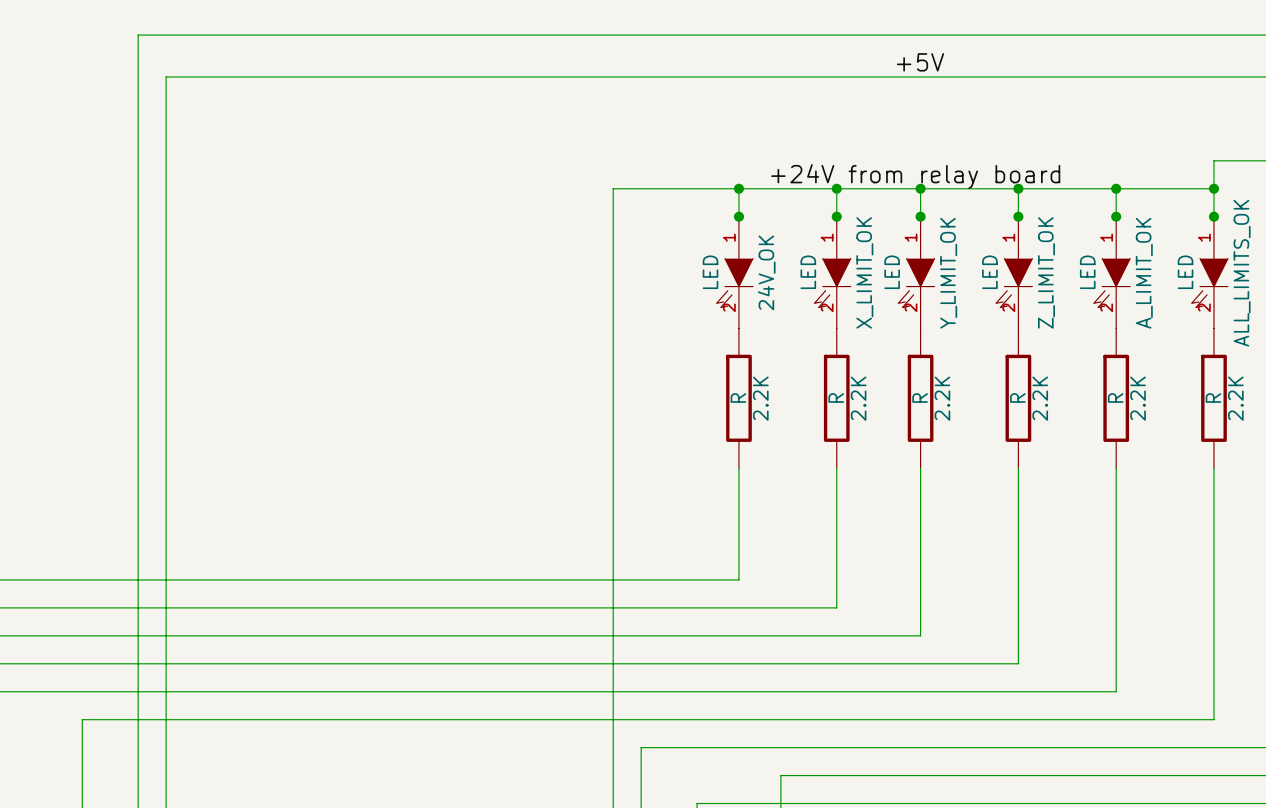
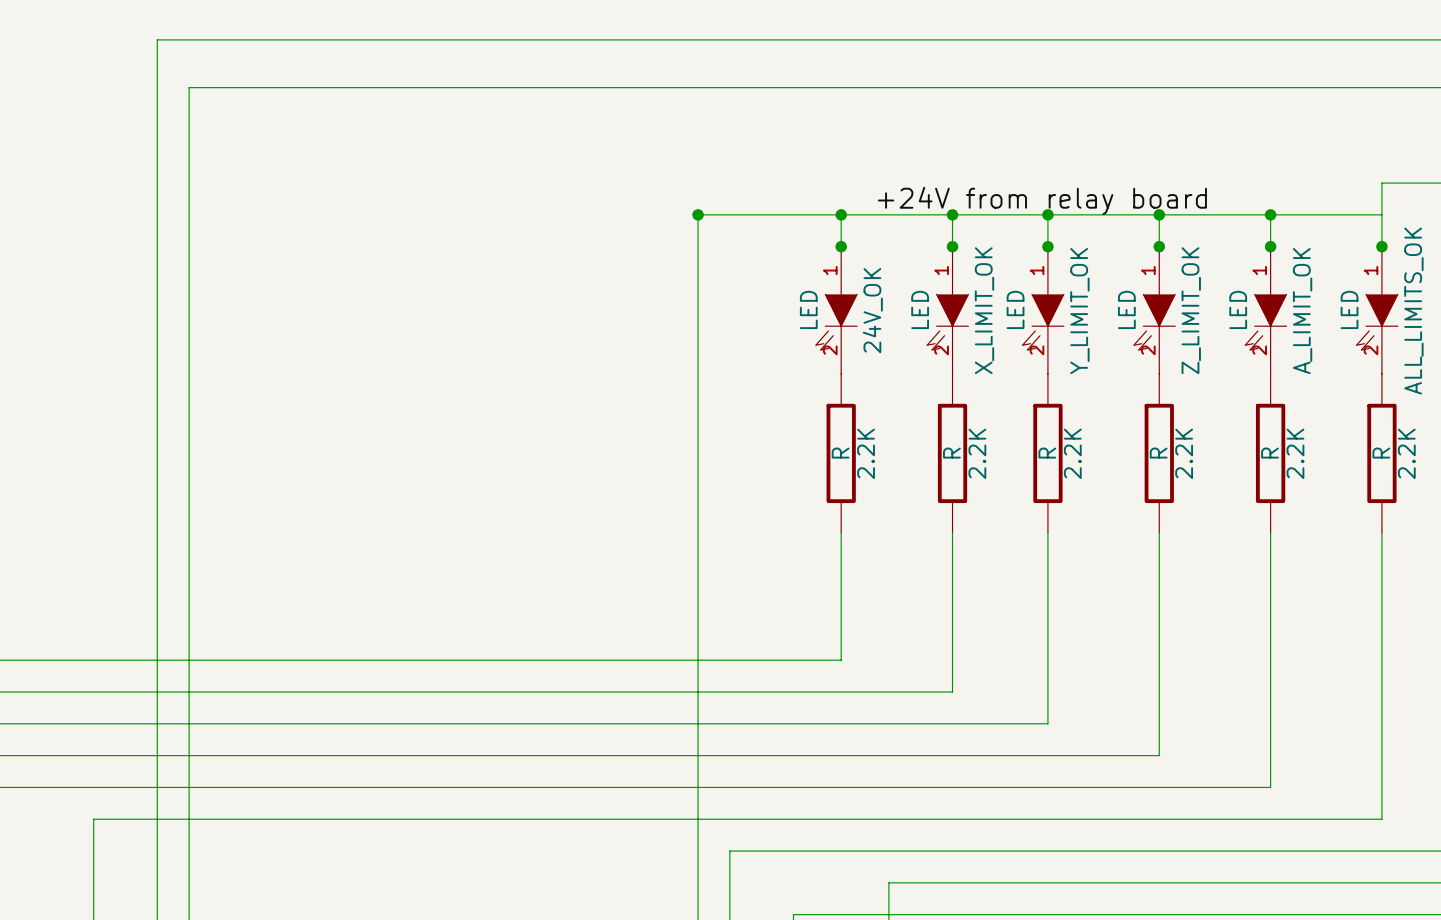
label: +5V (920, 62) -> none
junction: none -> (698, 214)
junction: (1214, 188) -> none

